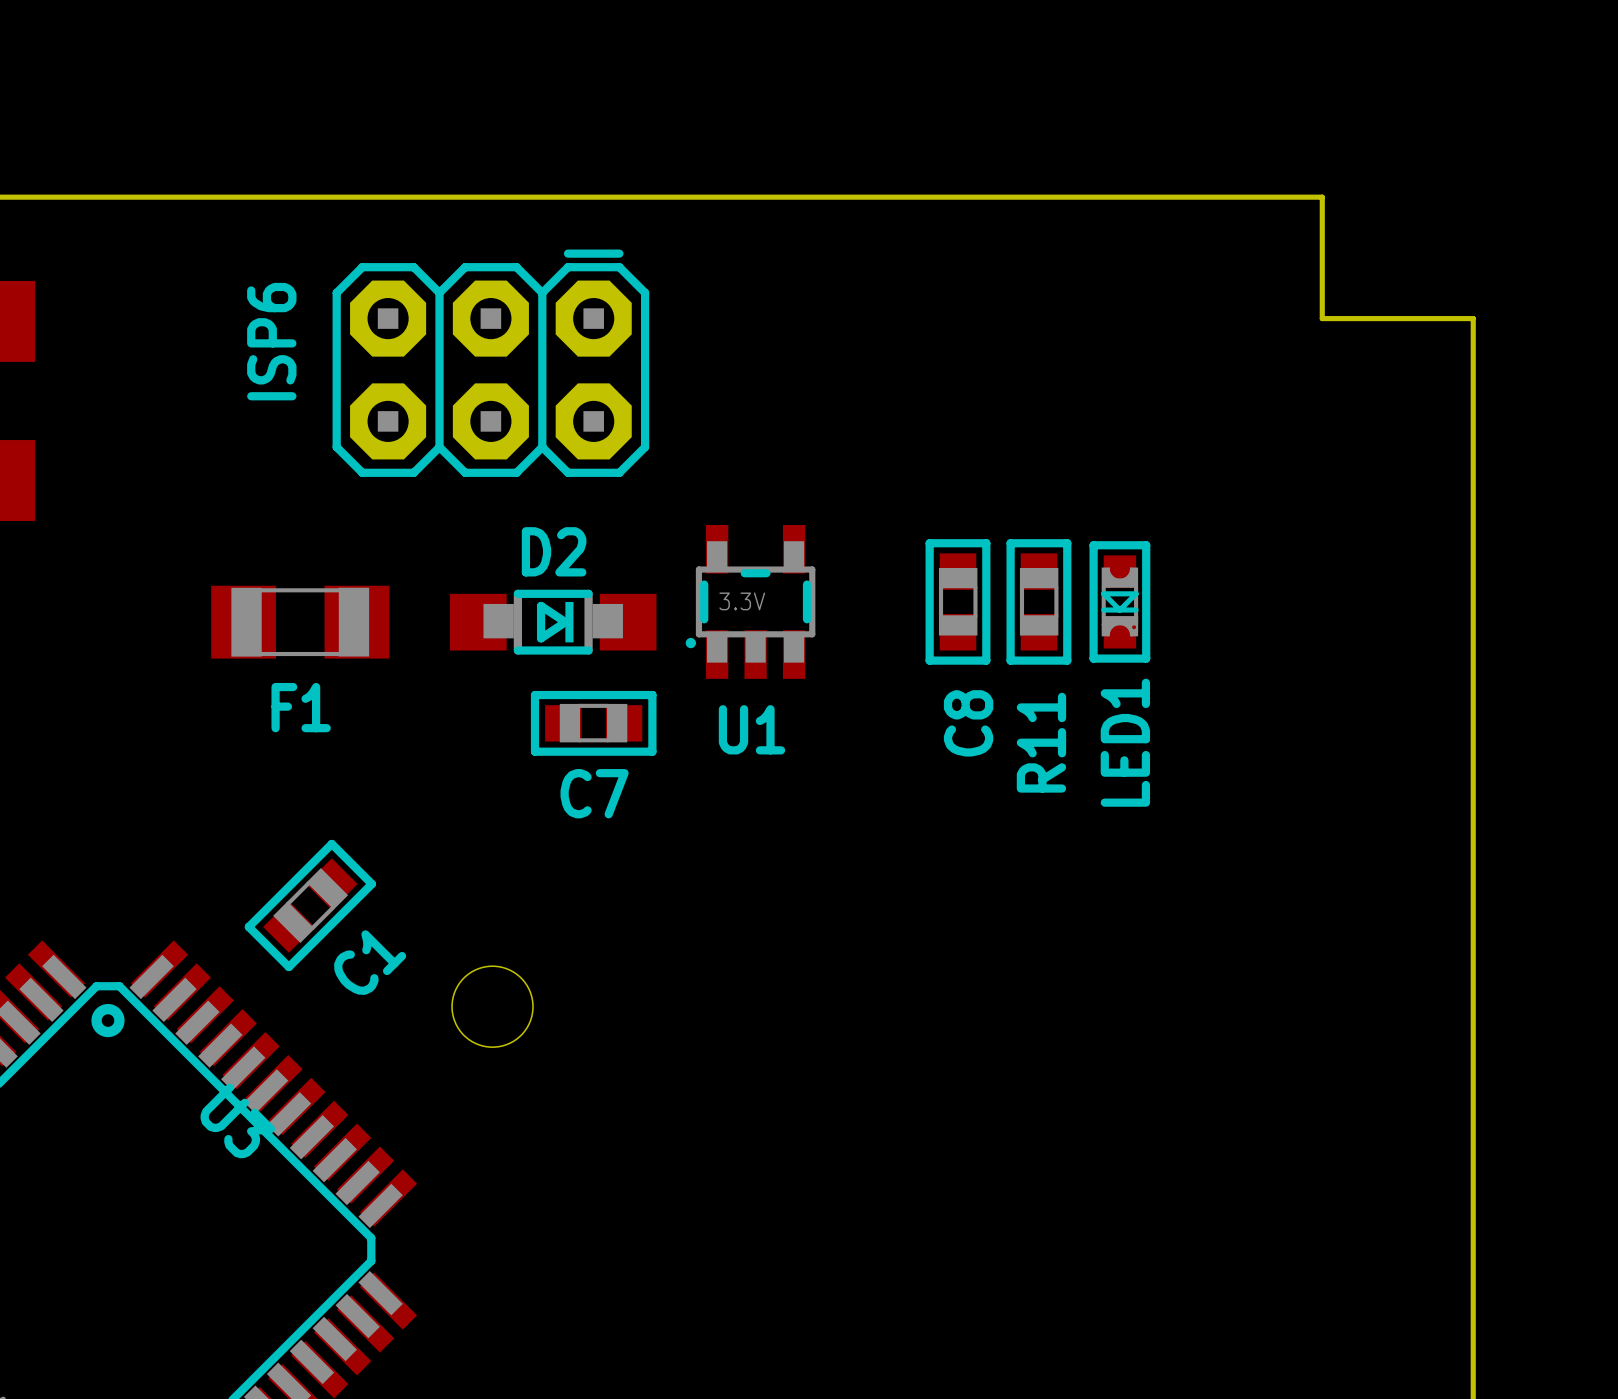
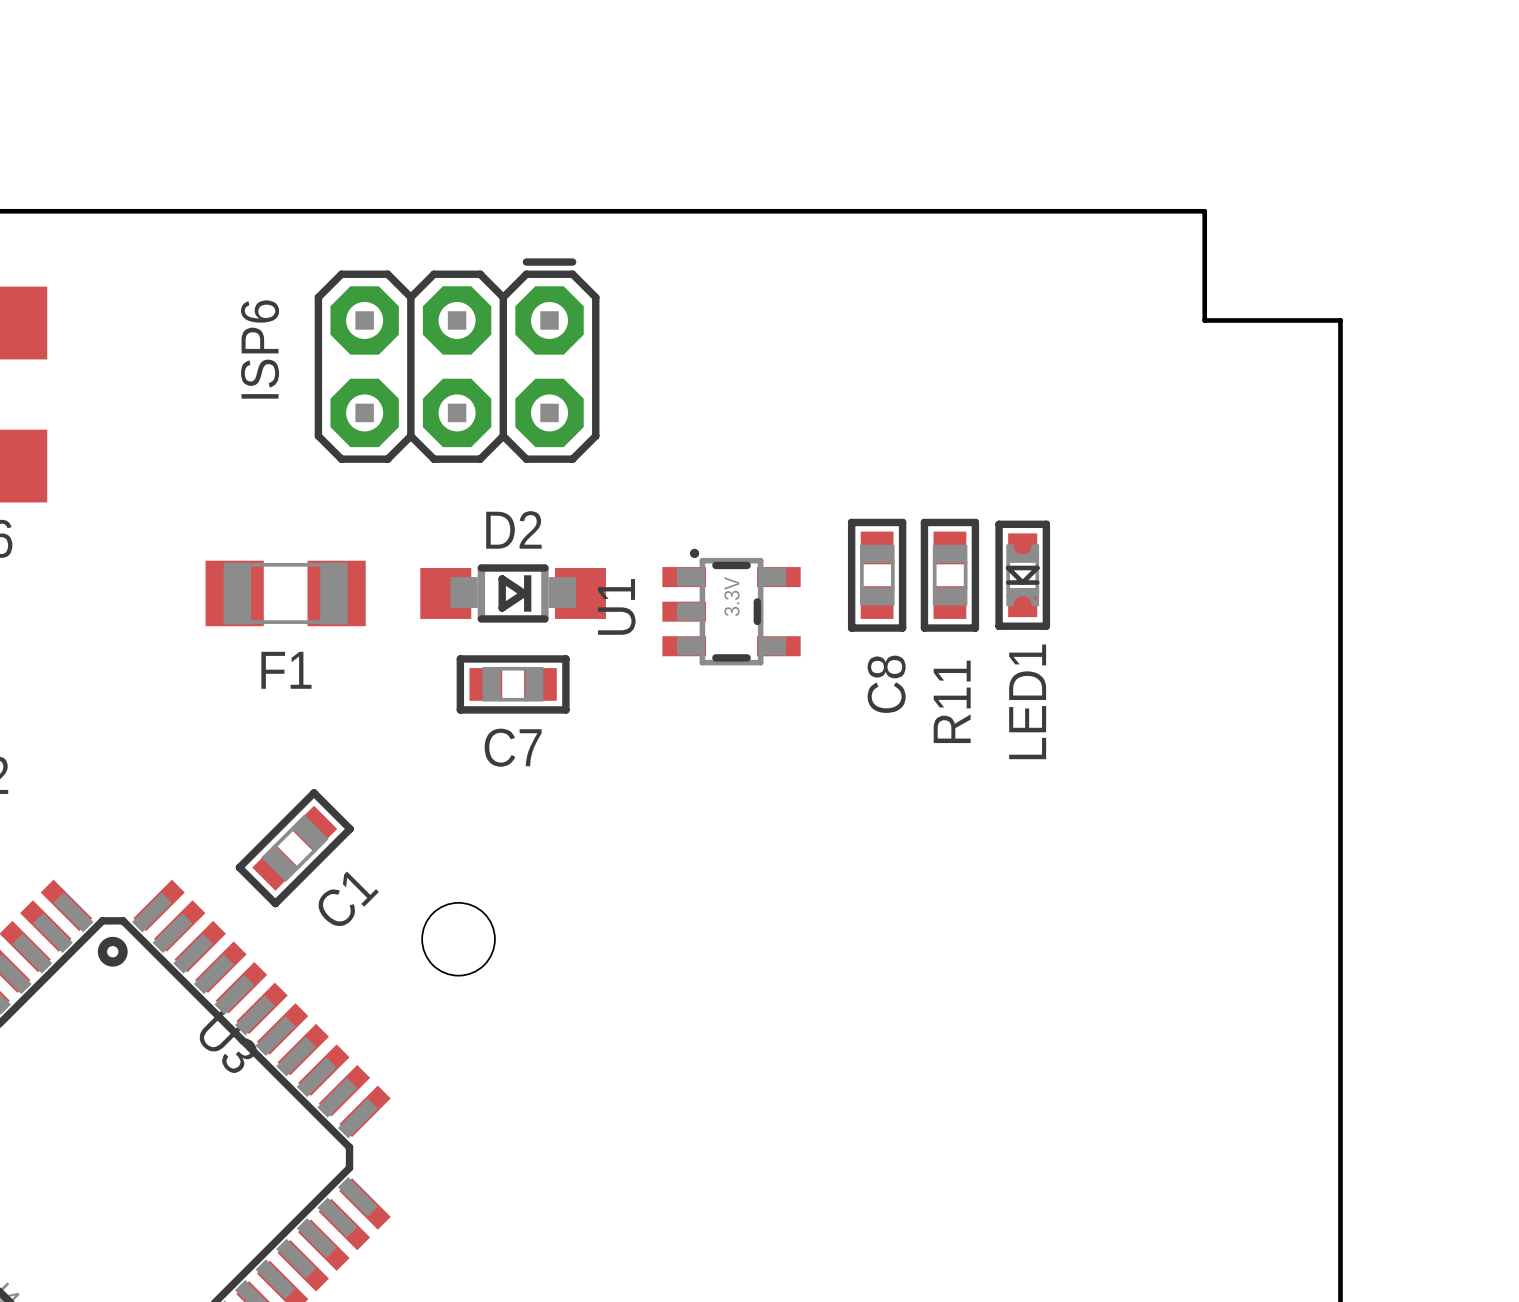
U1 rotation: 0° (750, 601) -> 90° clockwise (731, 607)
C7 position: (593, 723) -> (513, 684)

